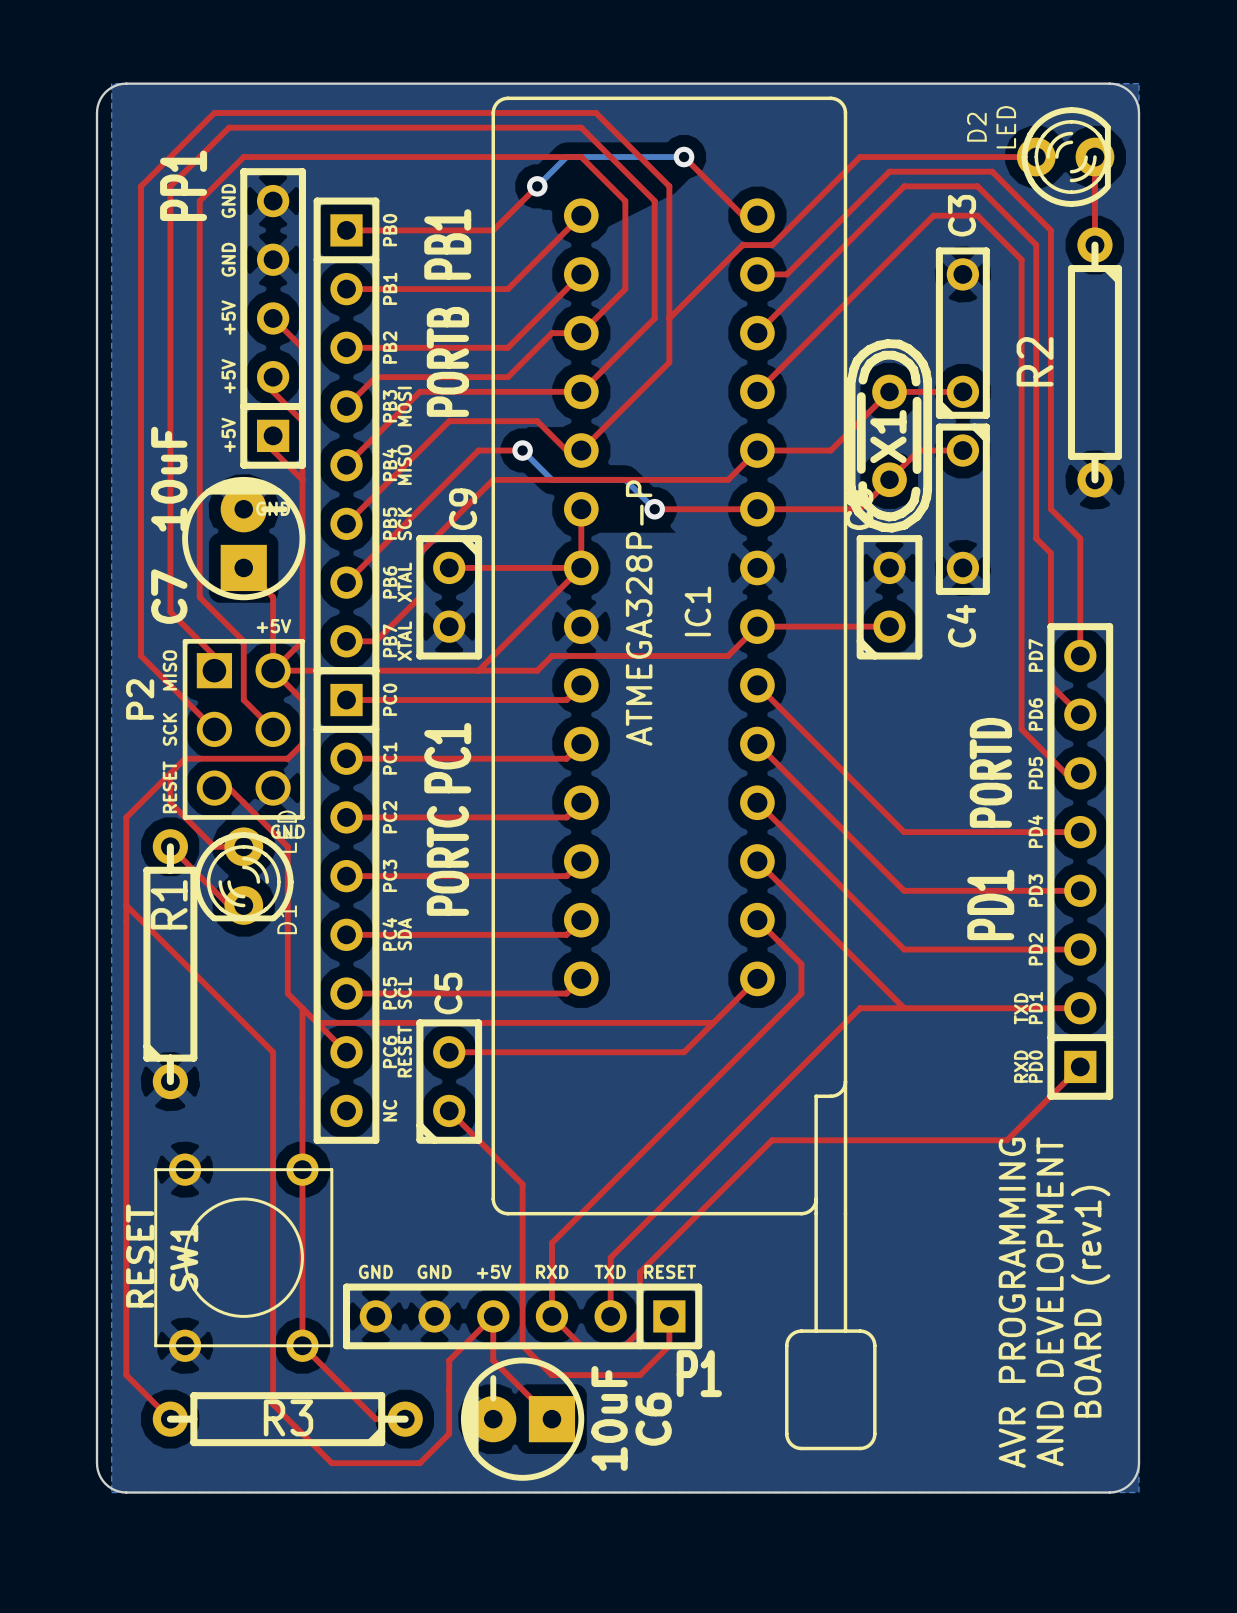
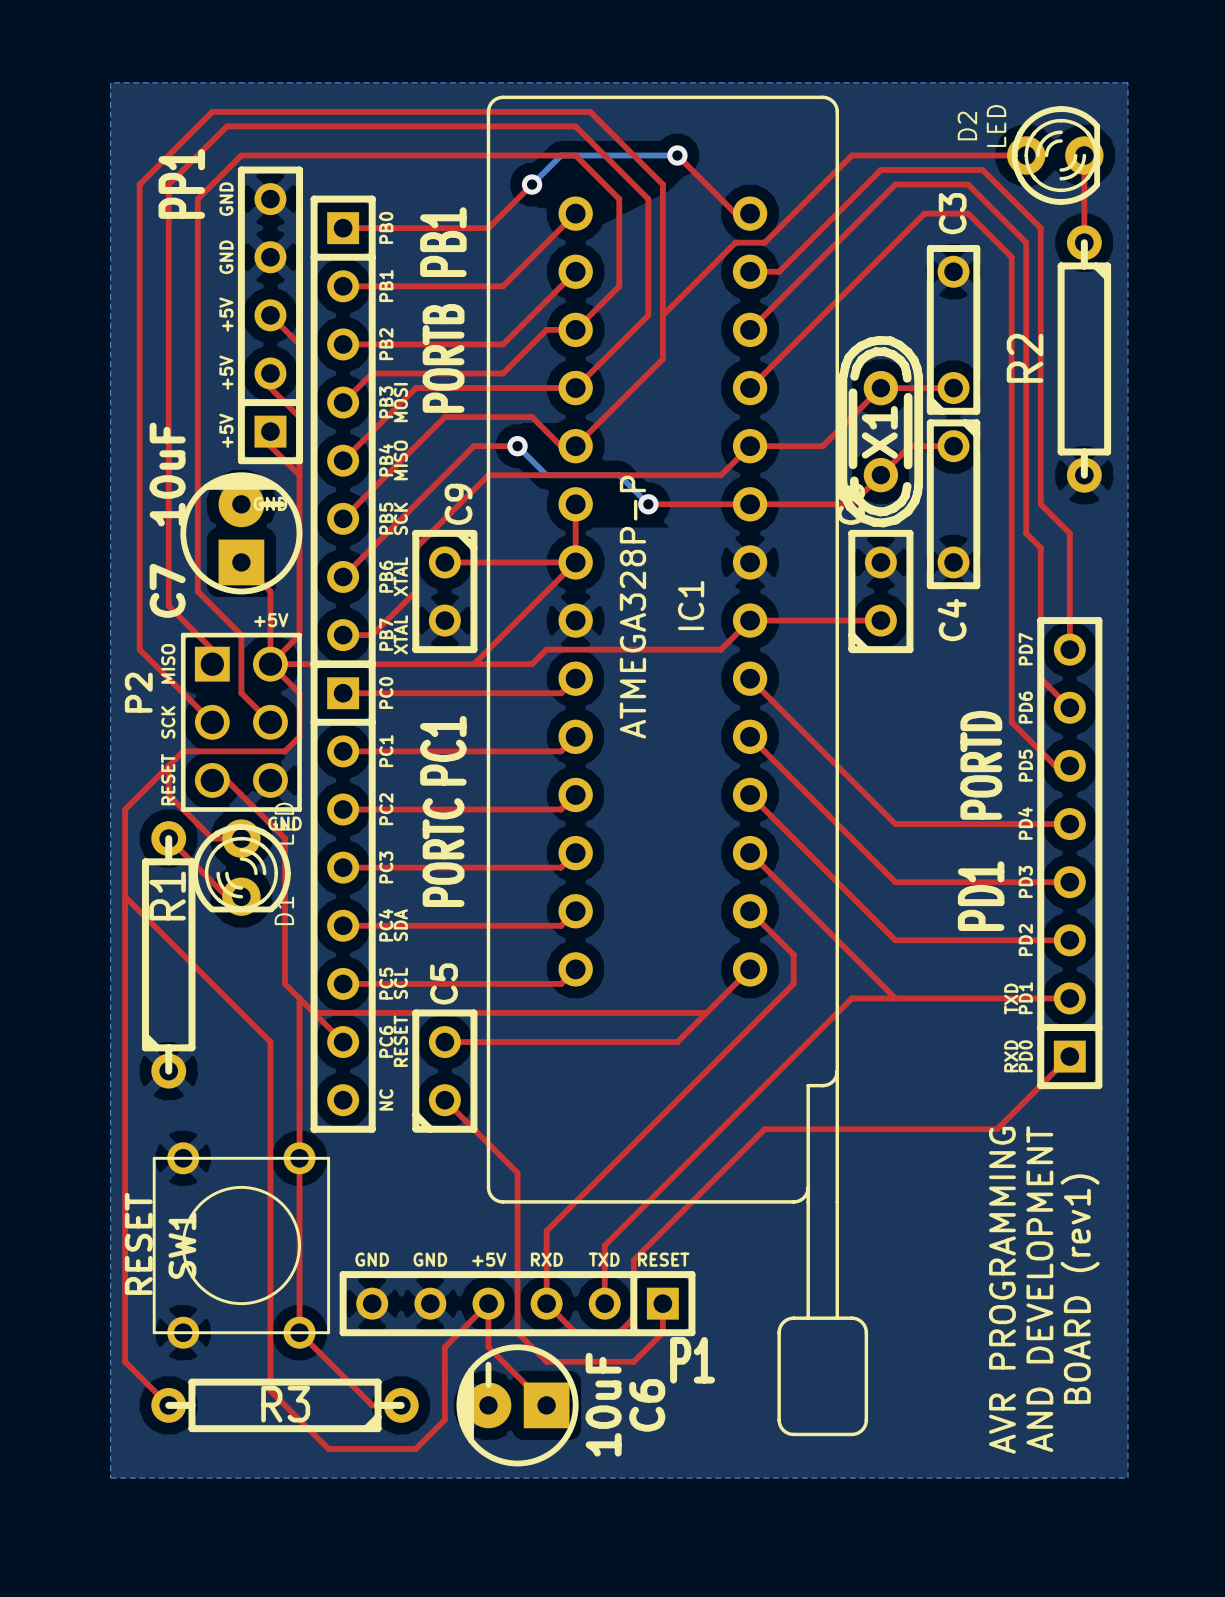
board edge: (126, 83) (1109, 83) (1120, 85) (1132, 95) (1139, 112) (1139, 1463) (1136, 1474) (1127, 1486) (1109, 1492) (126, 1492) (111, 1488) (103, 1481) (97, 1463) (97, 112) (99, 101) (105, 92) (115, 85) (126, 83) -> none

